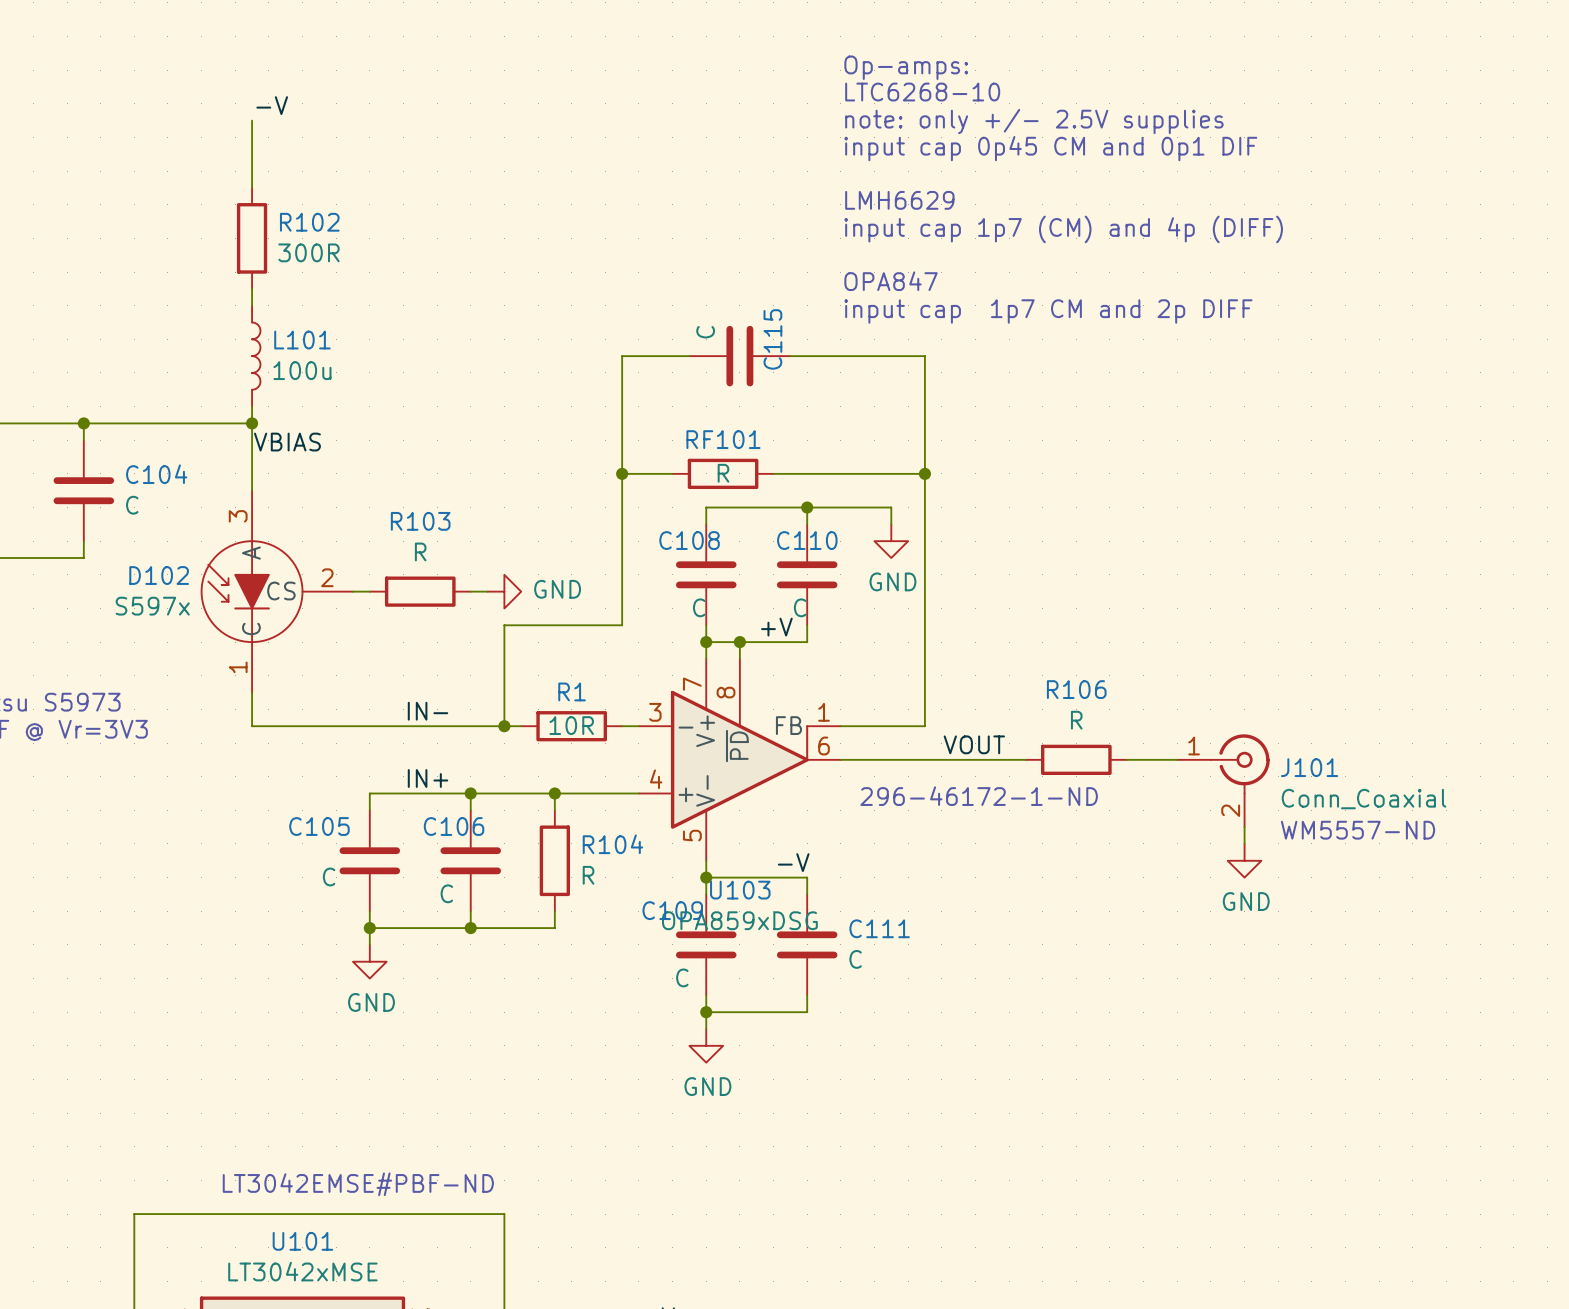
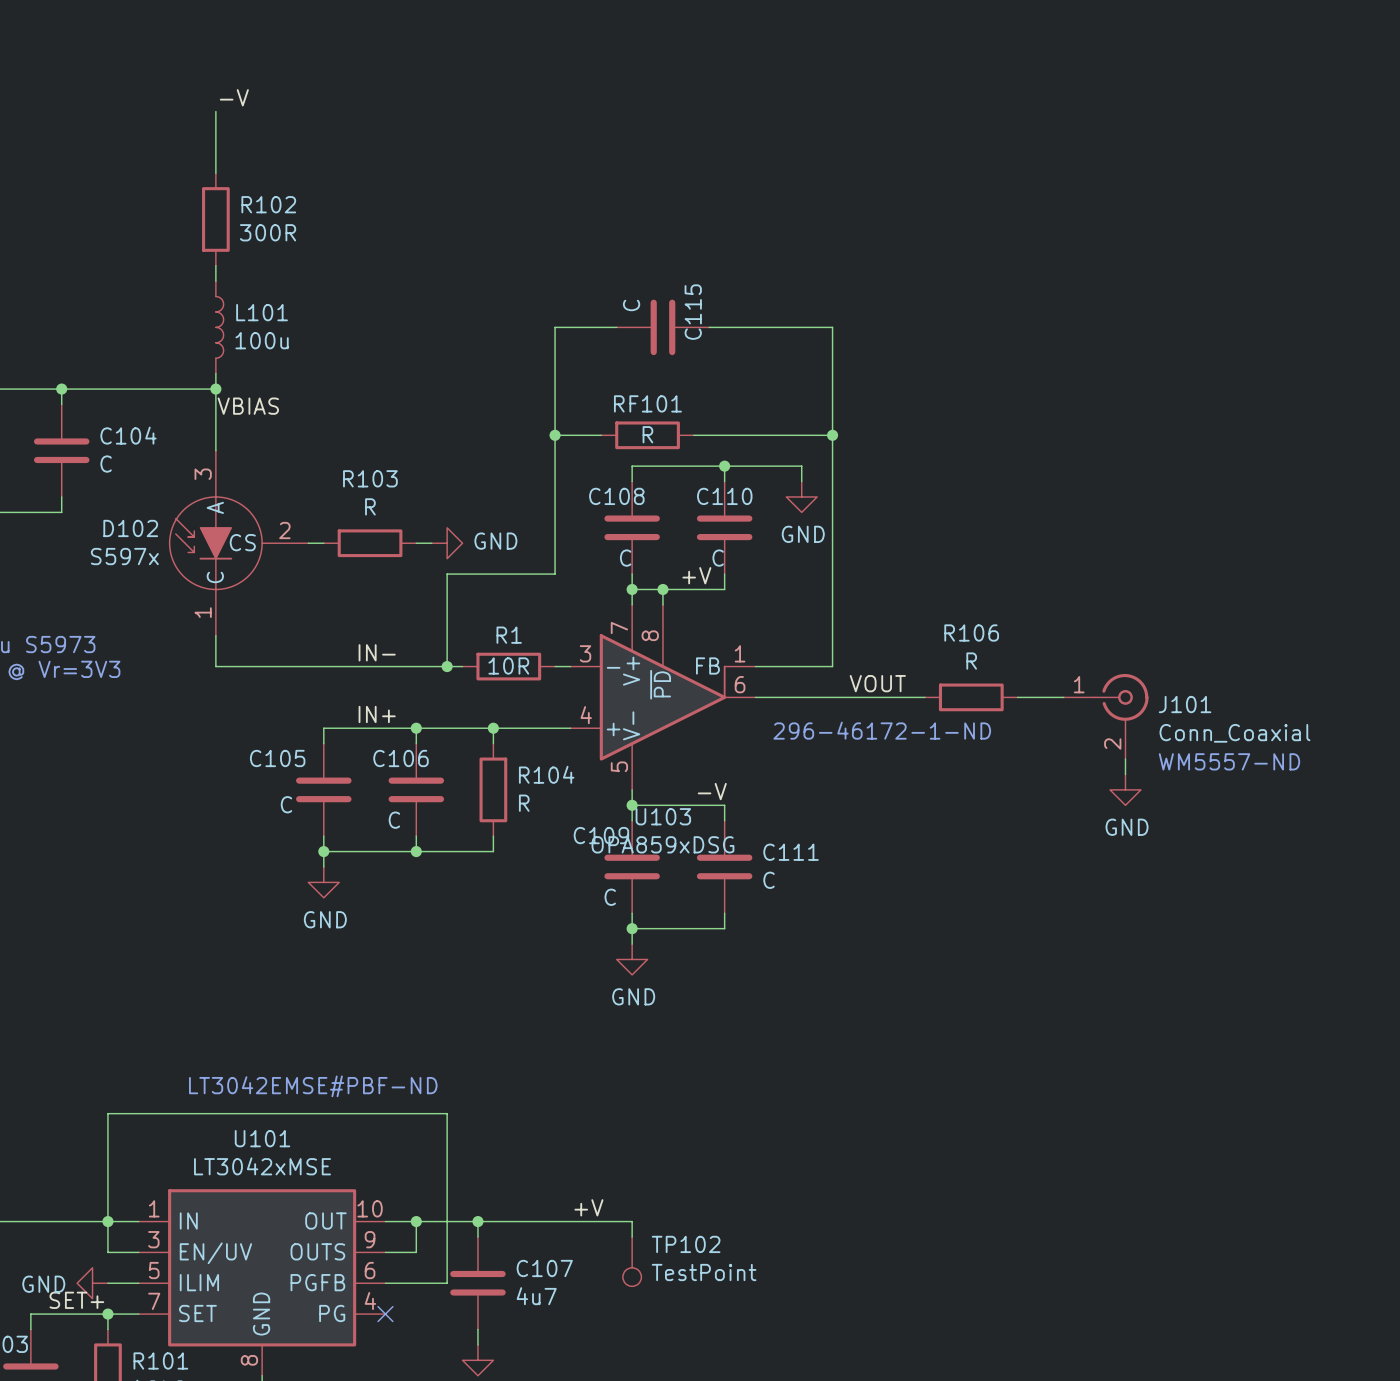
text: Op-amps: (906, 67) -> none
text: LTC6268-10 (922, 92) -> none
text: note: only +/- 2.5V supplies (1034, 121) -> none
text: input cap 0p45 CM and 0p1 DIF (1050, 148) -> none
text: LMH6629 (899, 200) -> none
text: input cap 1p7 (CM) and 4p (DIFF) (1063, 229) -> none
text: OPA847 (891, 281) -> none
text: input cap 1p7 CM and 2p DIFF (1048, 311) -> none

